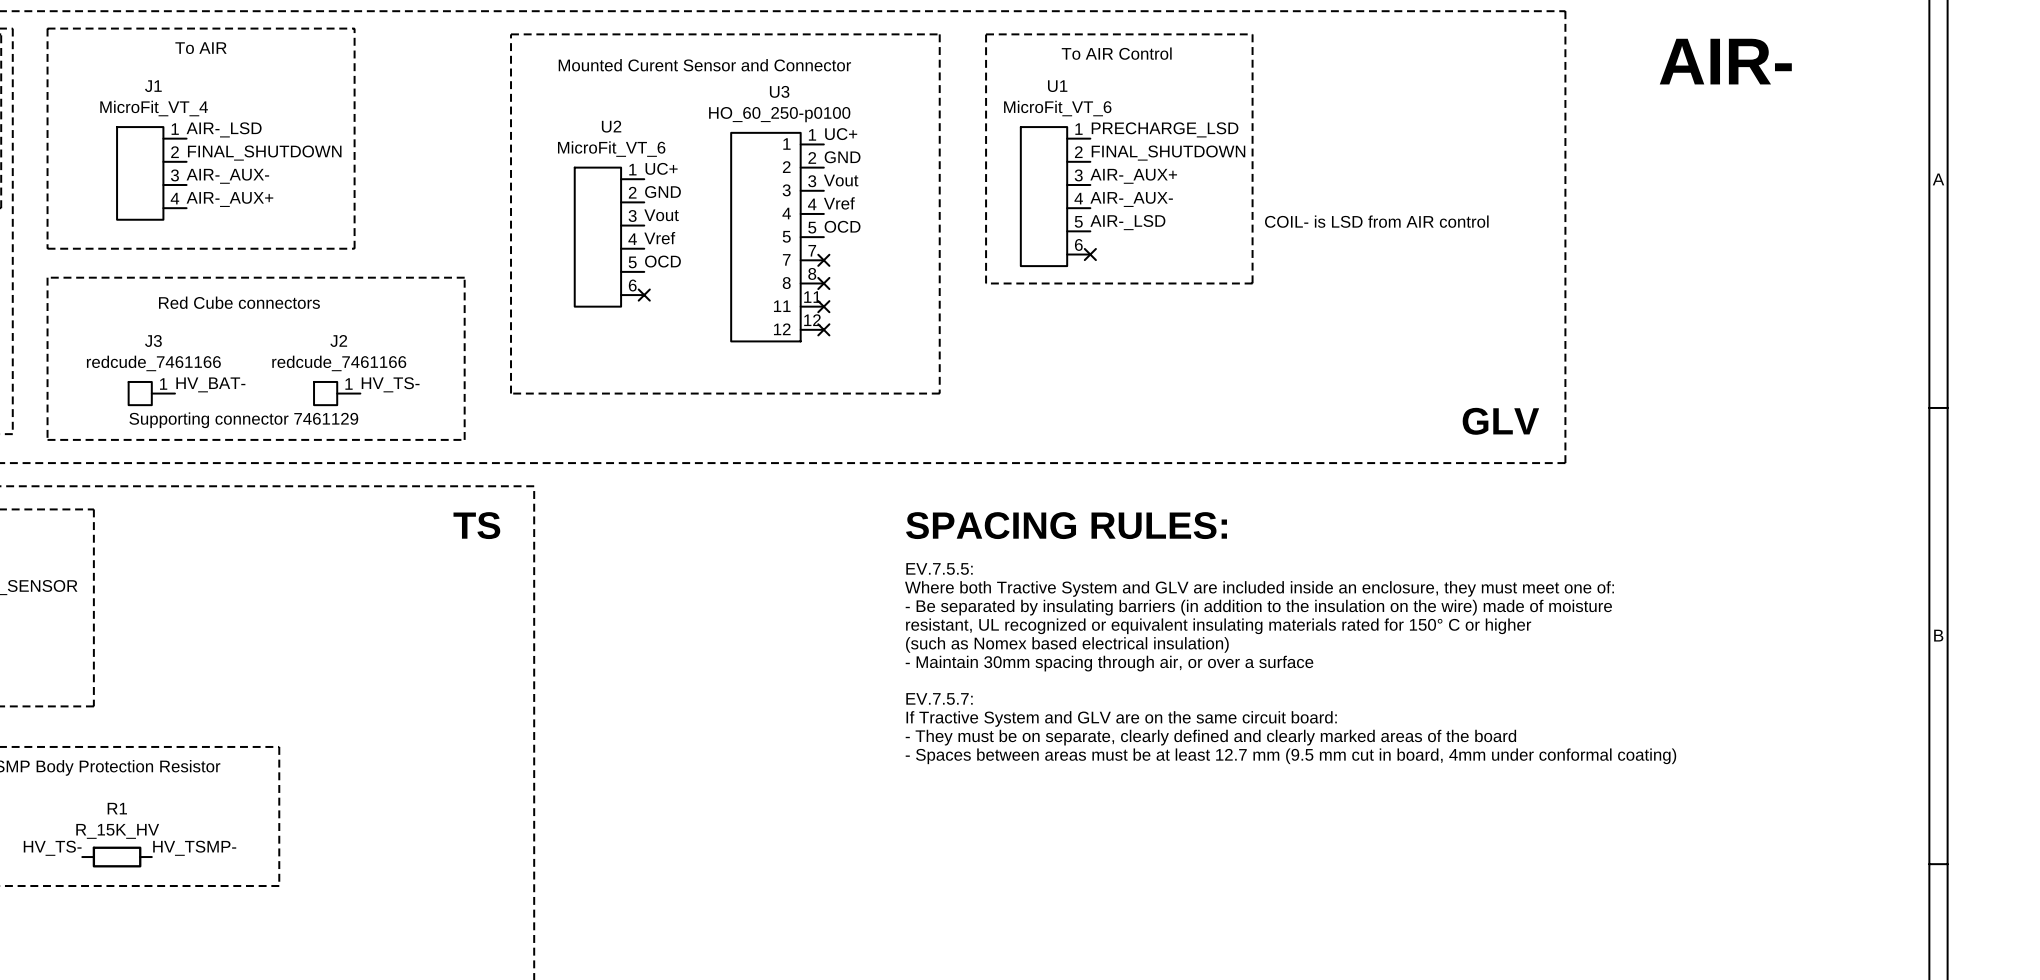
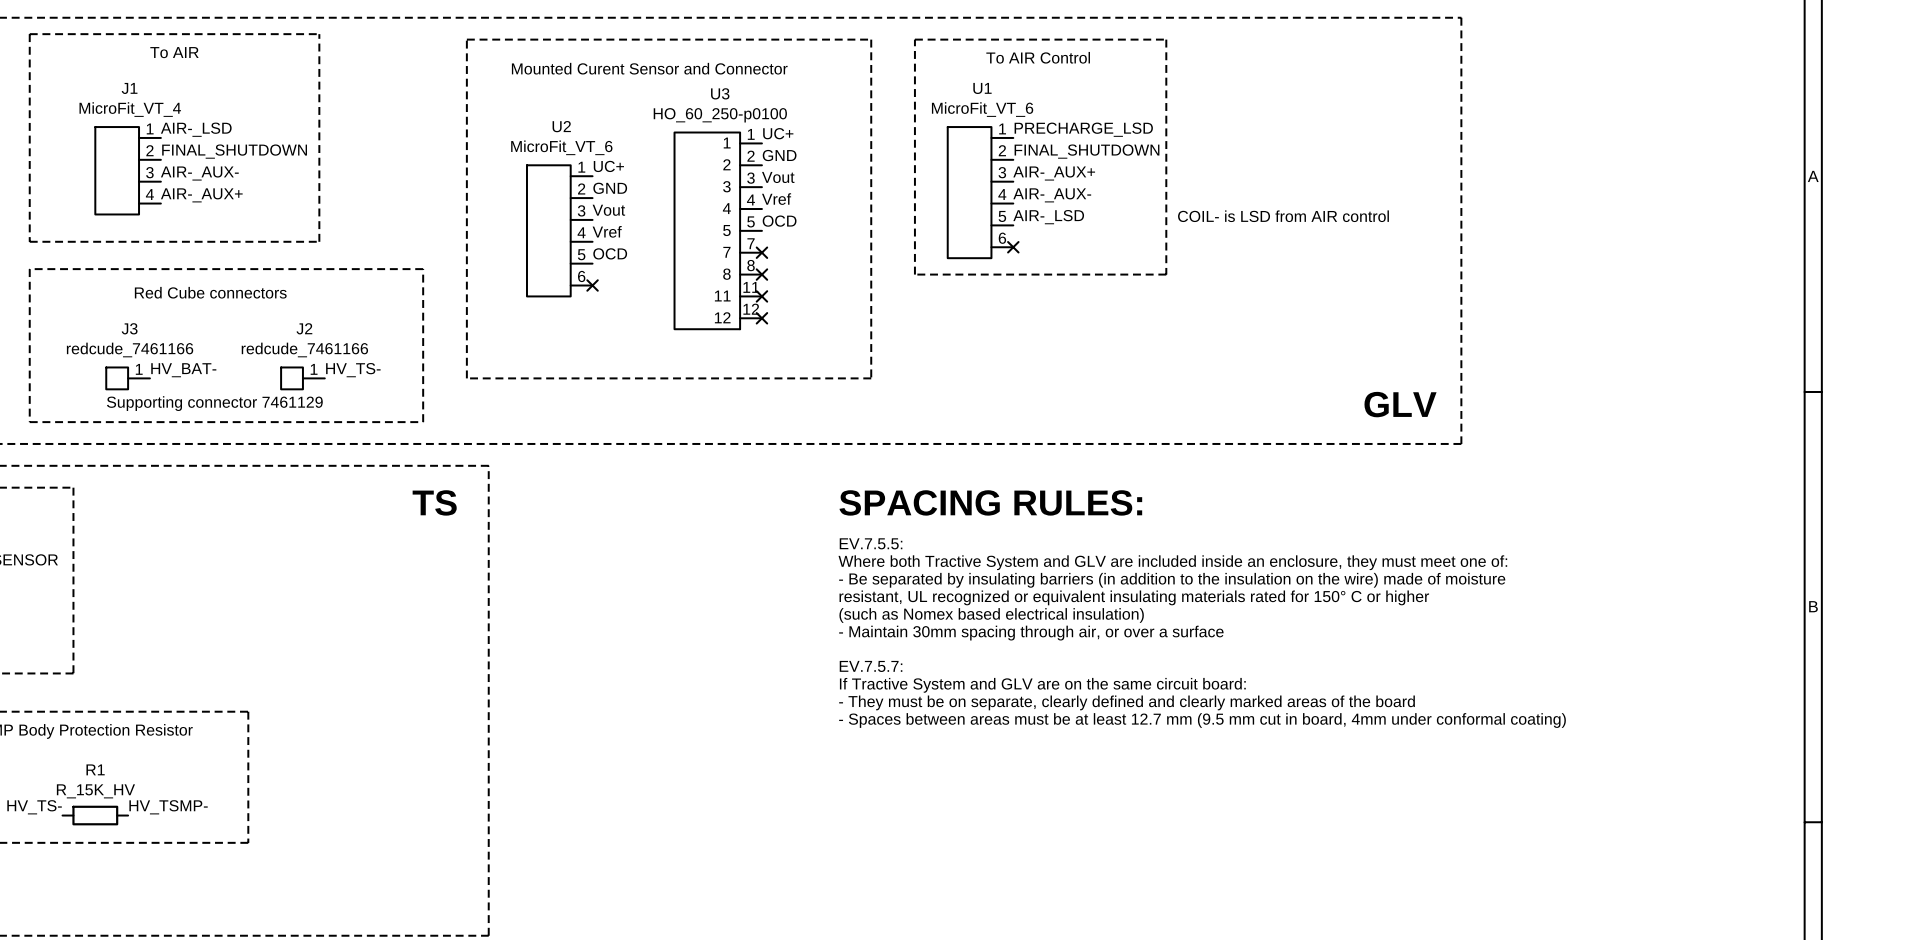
text: AIR- (1725, 61) -> none

